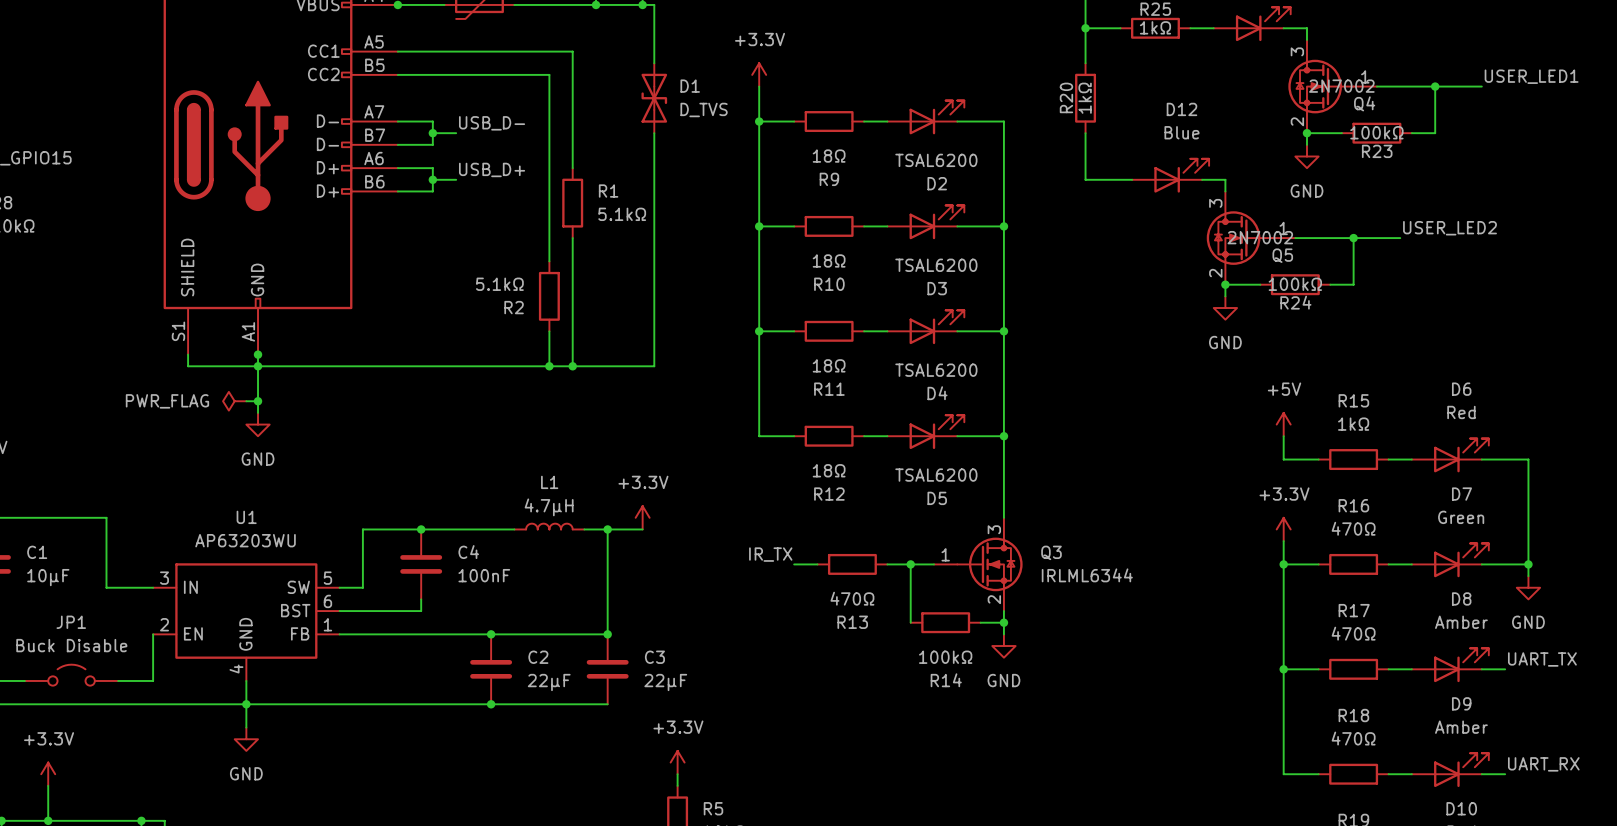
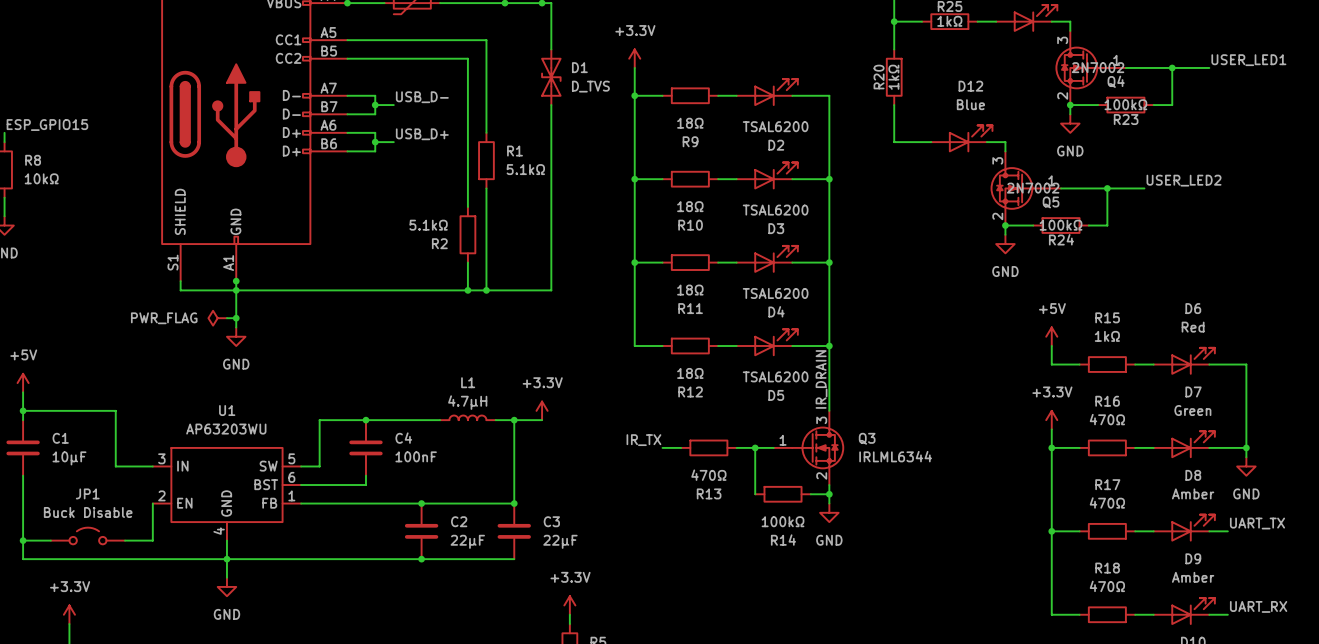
label: none -> IR_DRAIN (821, 379)

